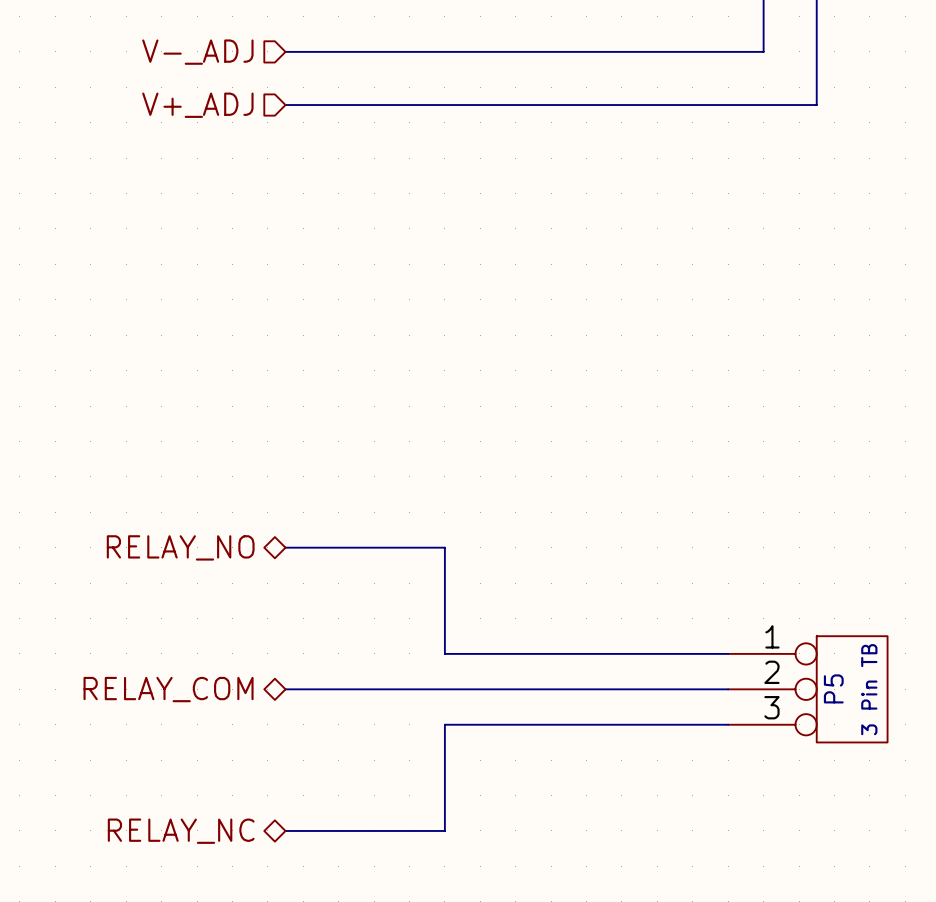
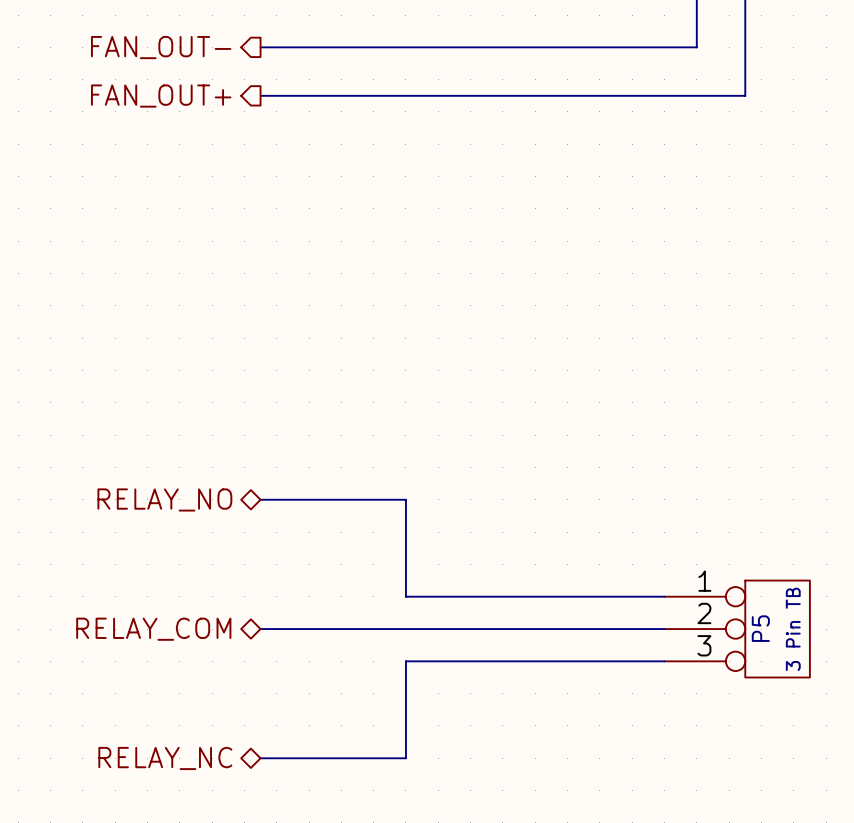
hierarchical label shape: input (197, 52) -> output (161, 47)
hierarchical label: V-_ADJ (197, 52) -> FAN_OUT- (161, 47)
hierarchical label shape: input (197, 105) -> output (161, 96)
hierarchical label: V+_ADJ (197, 105) -> FAN_OUT+ (161, 96)

